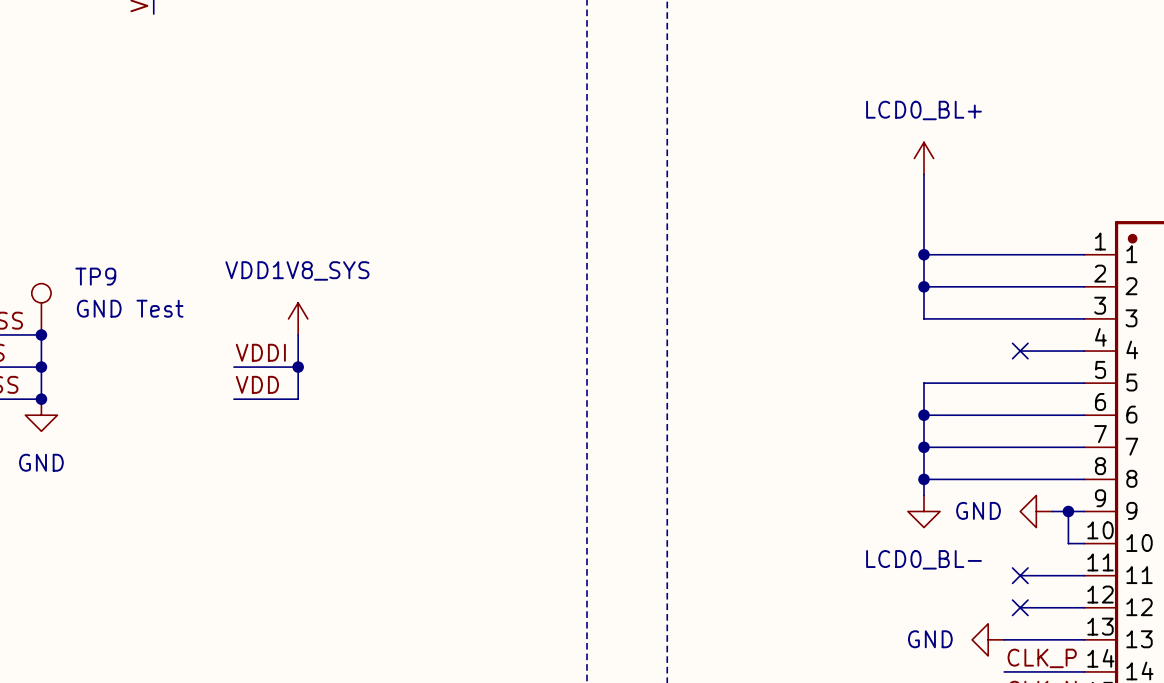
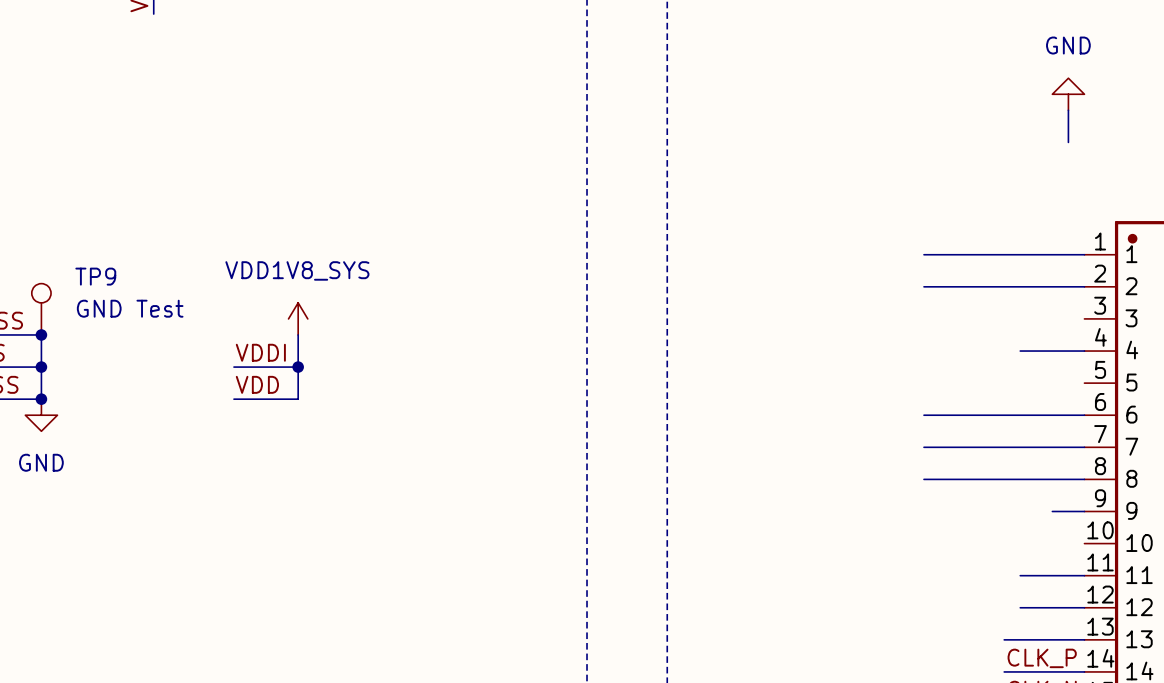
power symbol: none -> GND (1068, 94)
wire: none -> (1068, 110) (1068, 142)
power symbol: LCD0_BL+ (923, 158) -> none
wire: (923, 174) (923, 318) (1084, 318) -> none
junction: (923, 254) -> none
junction: (923, 286) -> none
no-connect mark: (1020, 351) -> none
wire: (1084, 383) (923, 383) (923, 495) -> none
junction: (923, 415) -> none
junction: (923, 447) -> none
junction: (923, 479) -> none
power symbol: LCD0_BL- (923, 511) -> none
power symbol: GND (1036, 511) -> none
wire: (1068, 511) (1068, 543) (1084, 543) -> none
junction: (1068, 511) -> none
no-connect mark: (1020, 575) -> none
no-connect mark: (1020, 607) -> none
power symbol: GND (988, 639) -> none

